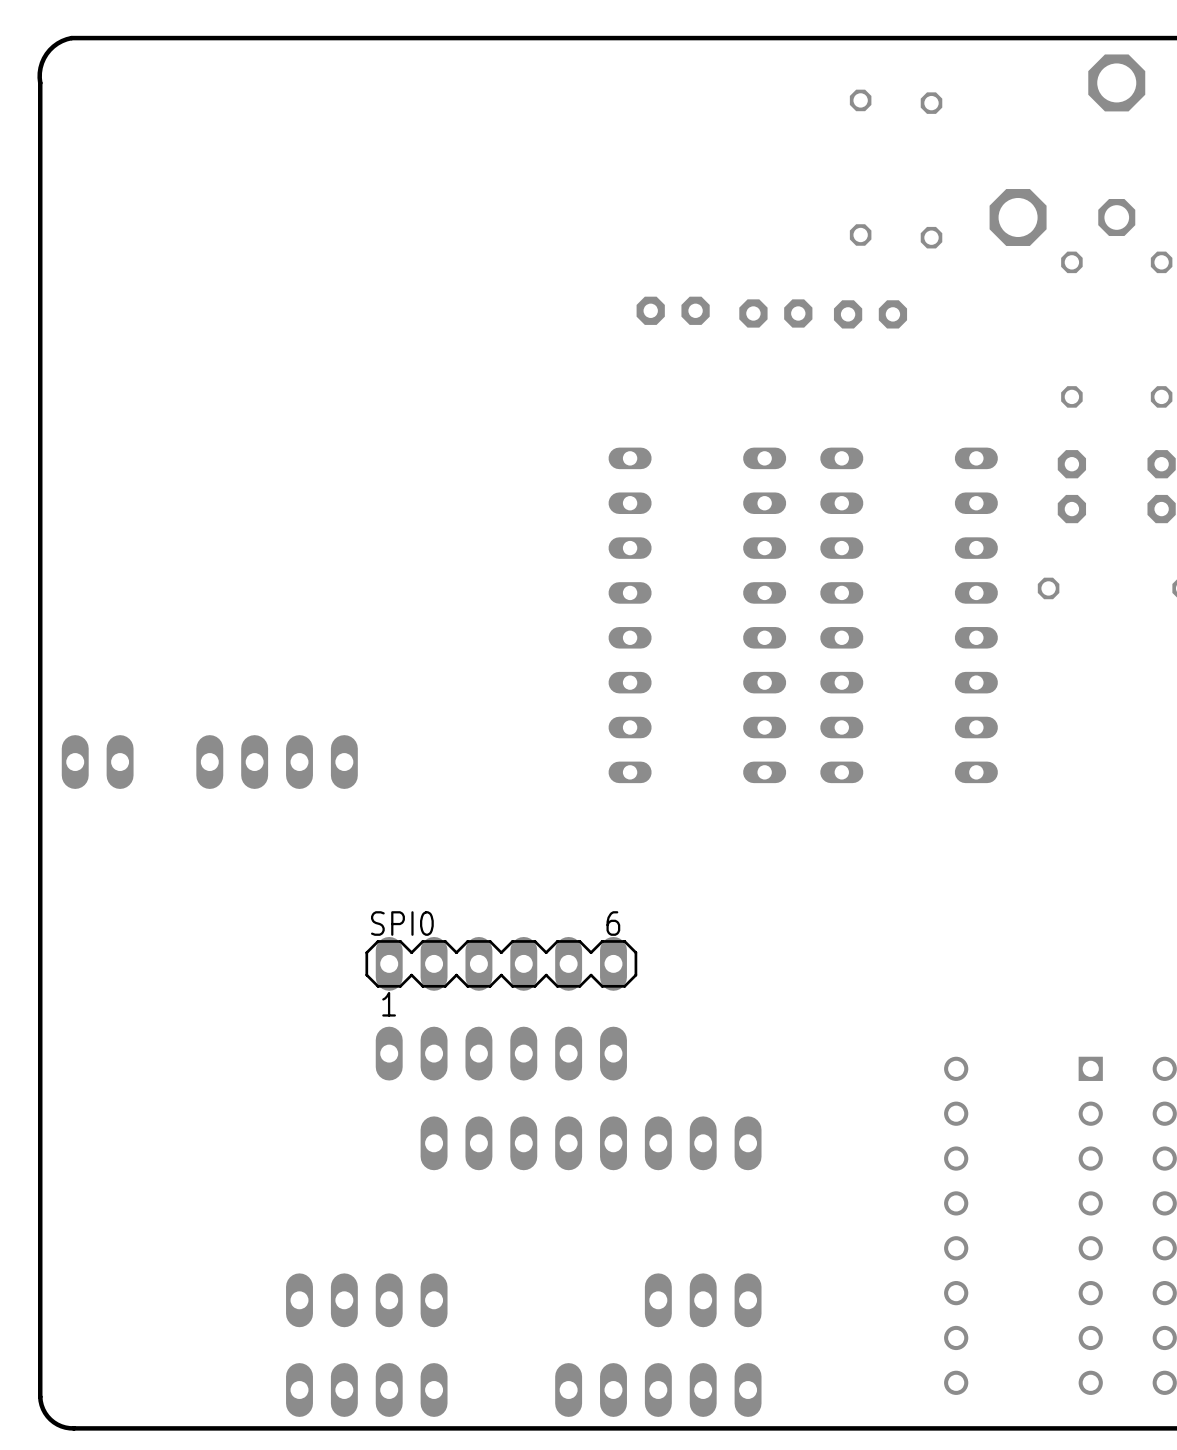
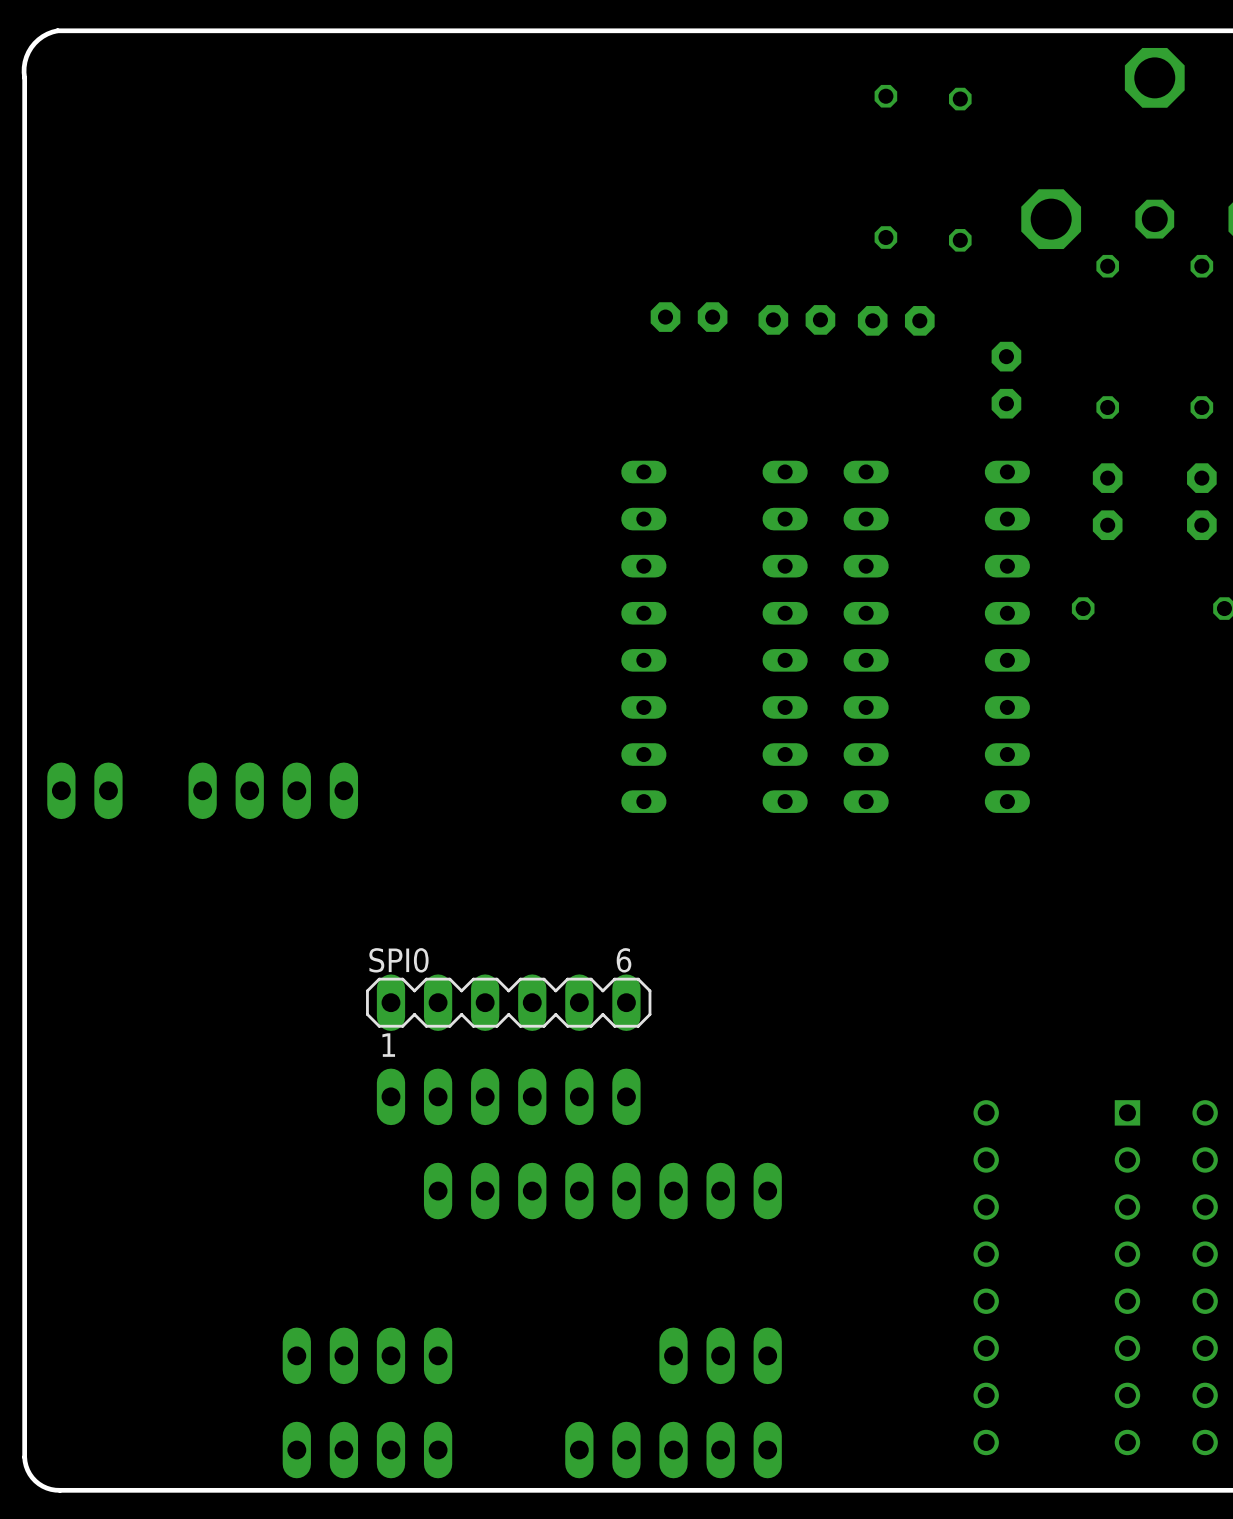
part: none -> (1006, 380)

